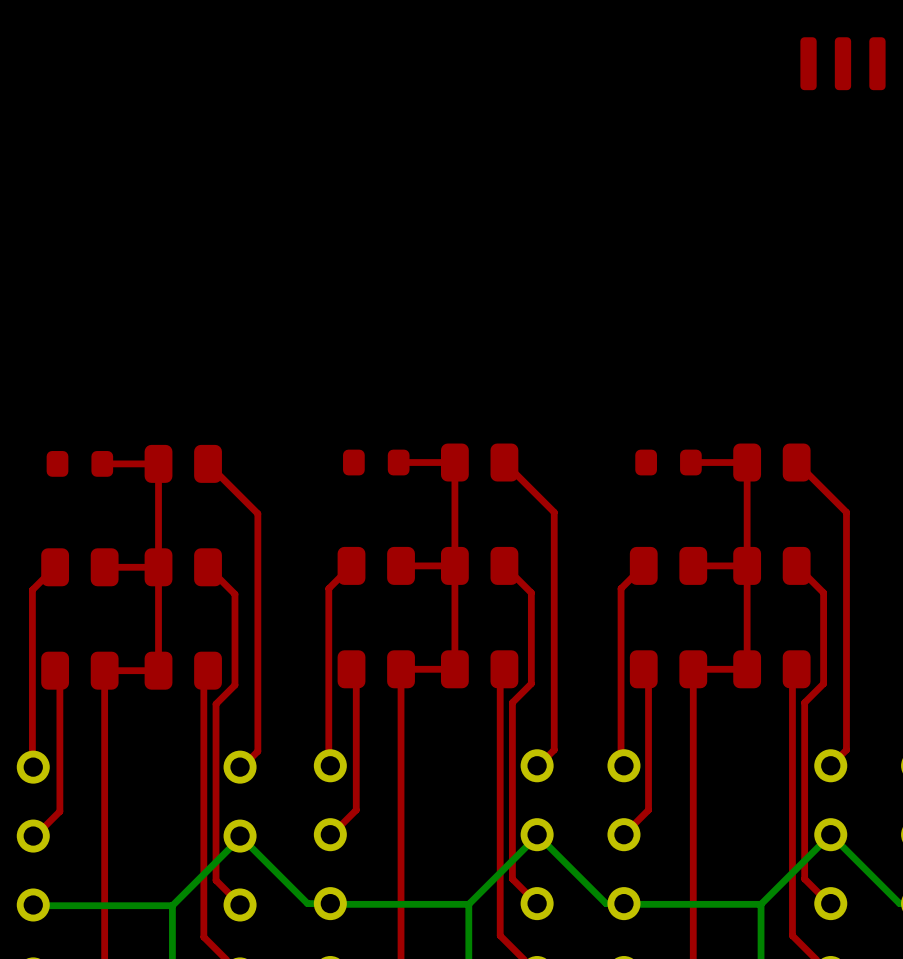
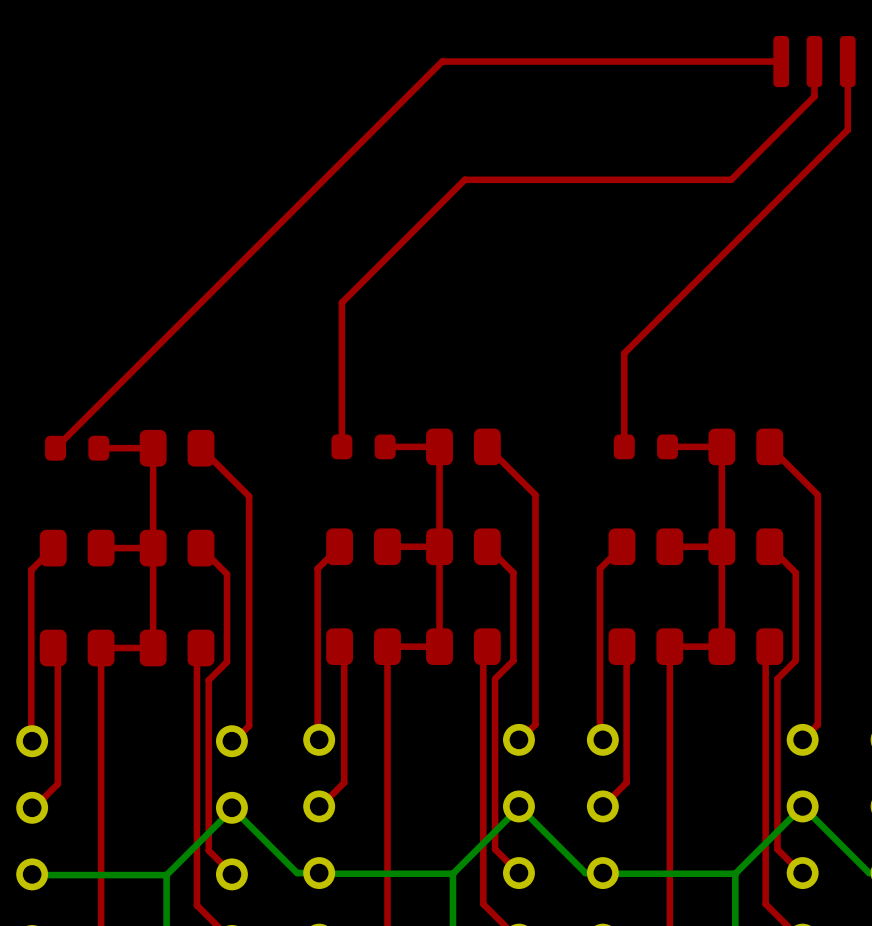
top track: none -> (781, 61) (442, 61) (55, 448)
top track: none -> (814, 61) (814, 96) (731, 179) (464, 179) (341, 302) (341, 446)
top track: none -> (847, 61) (847, 129) (624, 353) (624, 446)

